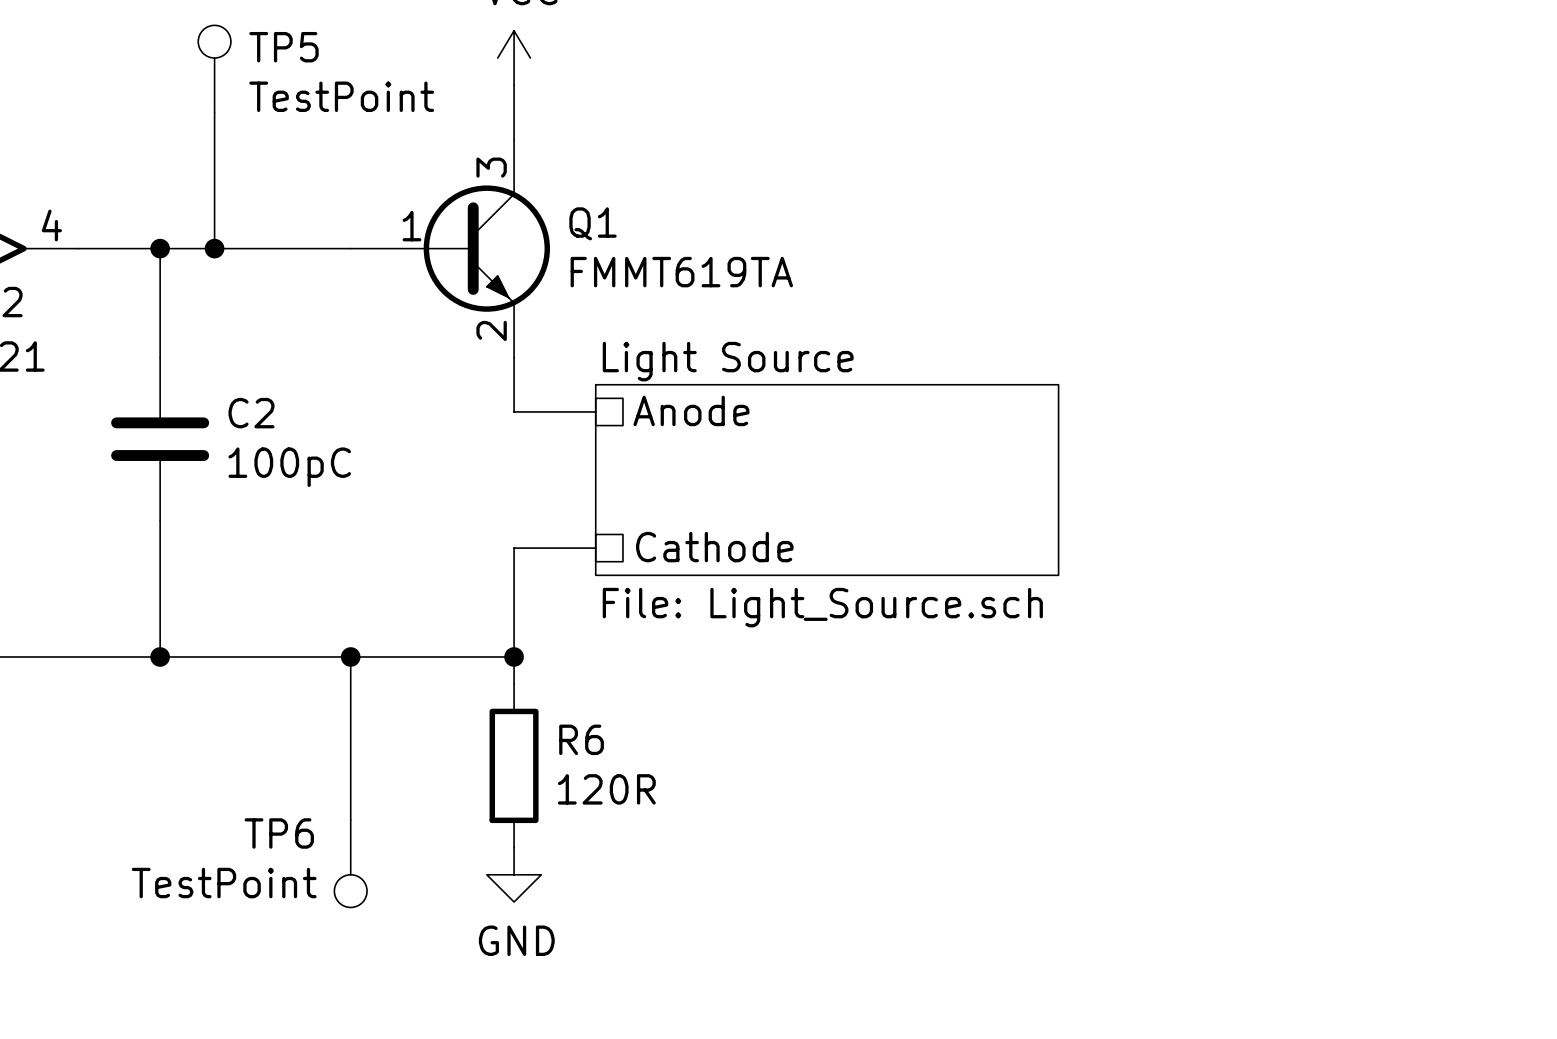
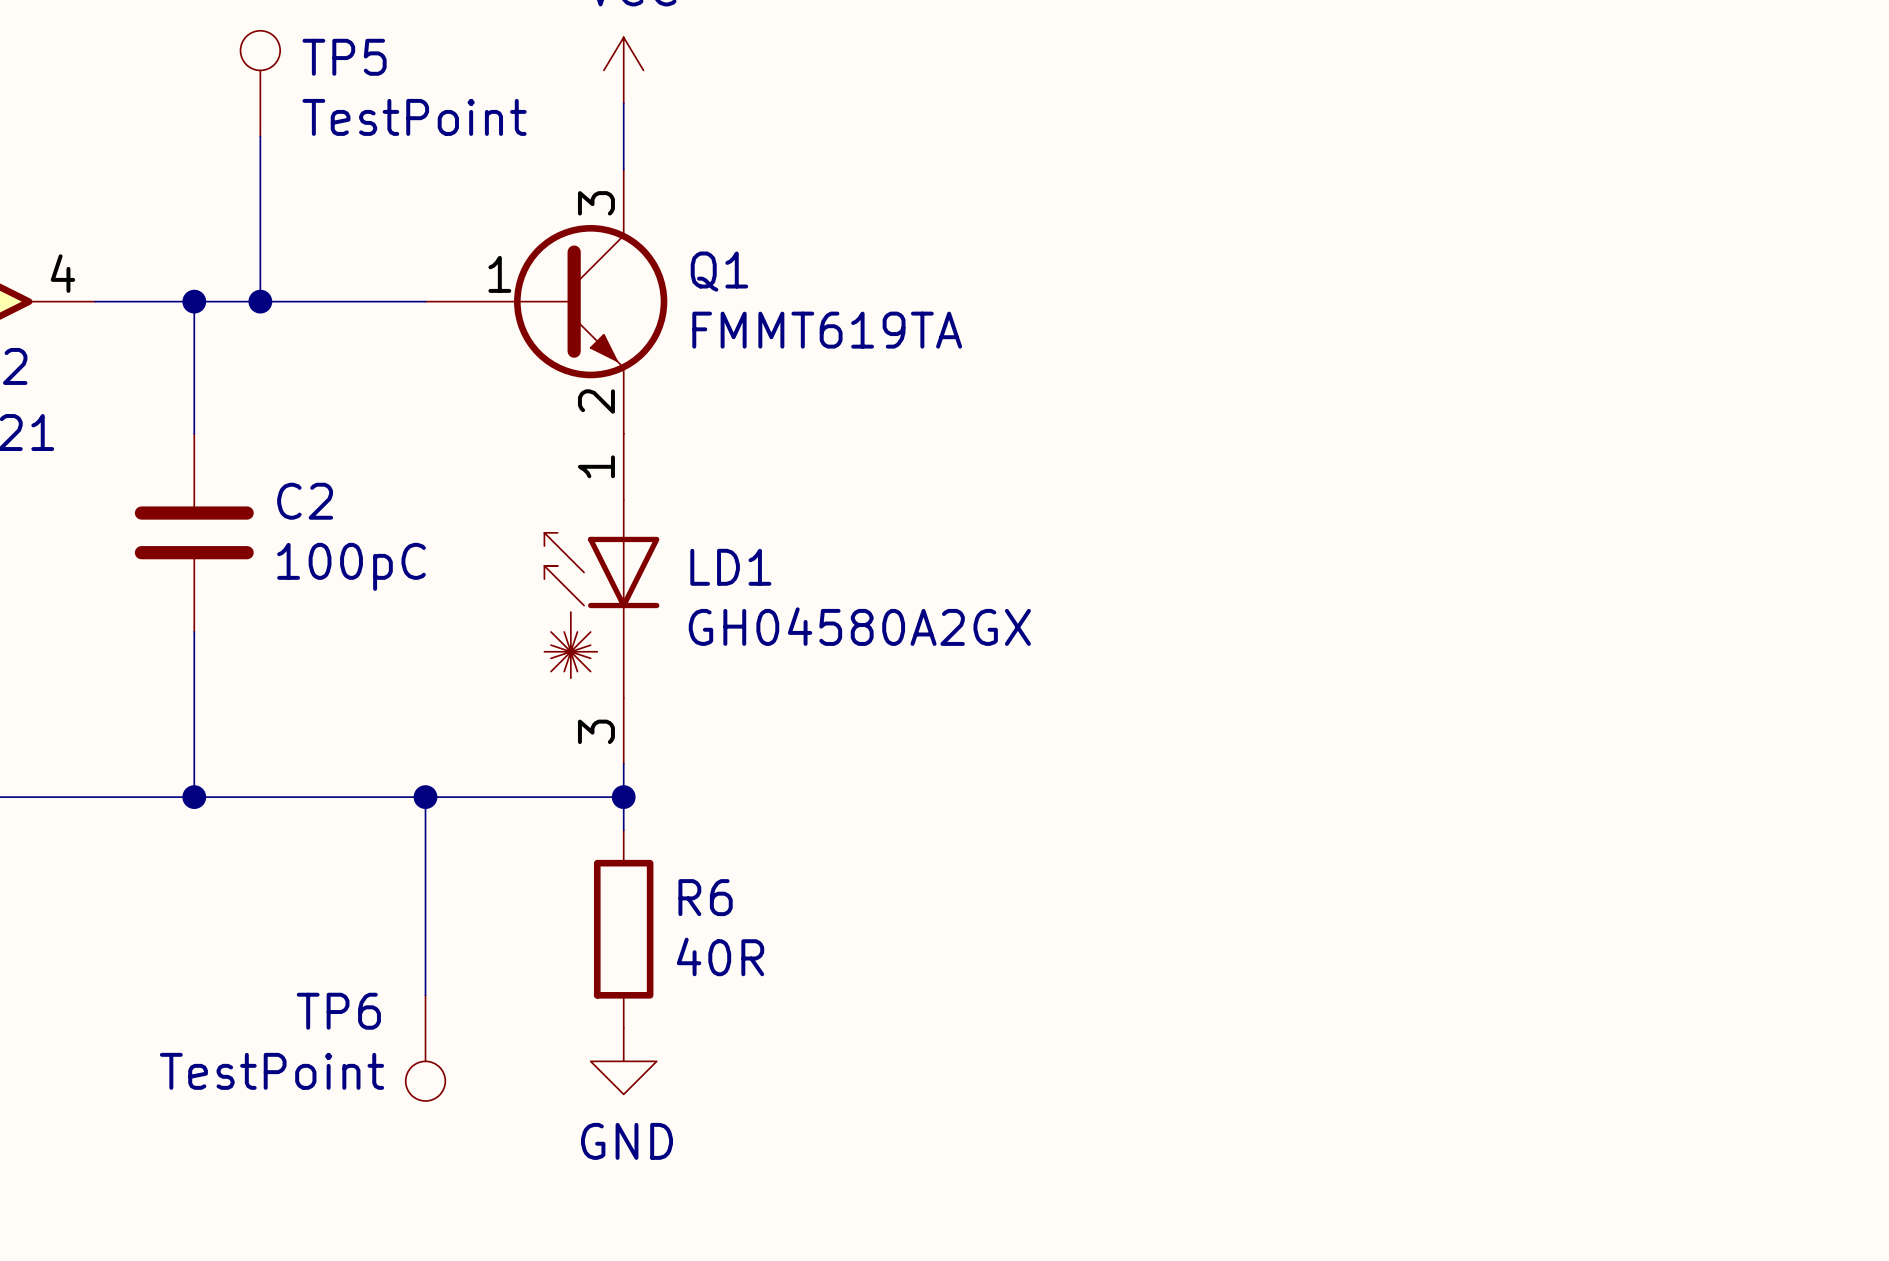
wire: (514, 357) (514, 411) (595, 411) -> none
sheet pin: Anode (691, 410) -> none
sheet Light Source: File: Light_Source.sch (827, 480) -> none
LD1: none -> GH04580A2GX (601, 598)
sheet pin: Cathode (714, 547) -> none
wire: (595, 548) (514, 548) (514, 629) -> none
R6 value: 120R (606, 789) -> 40R (720, 956)

